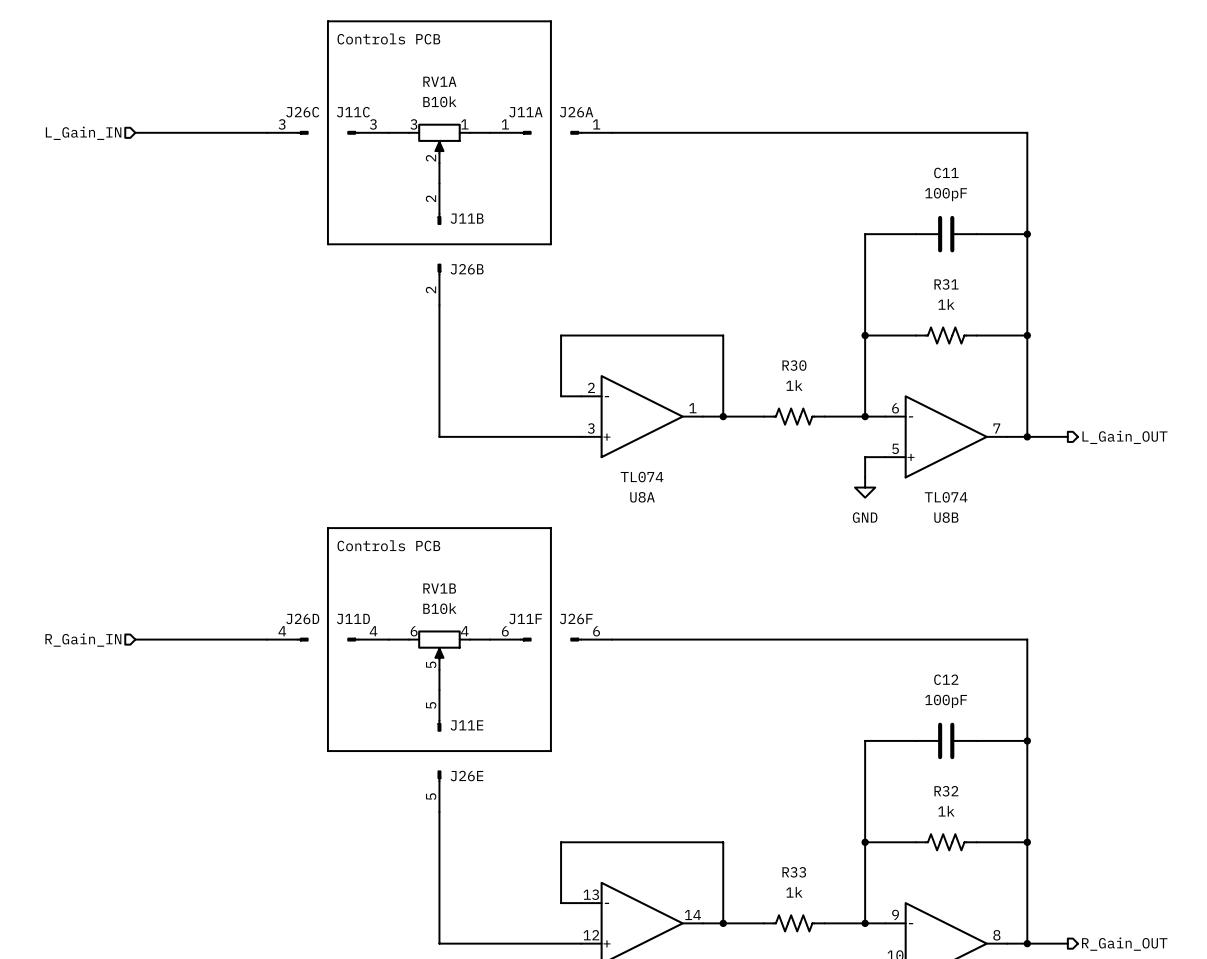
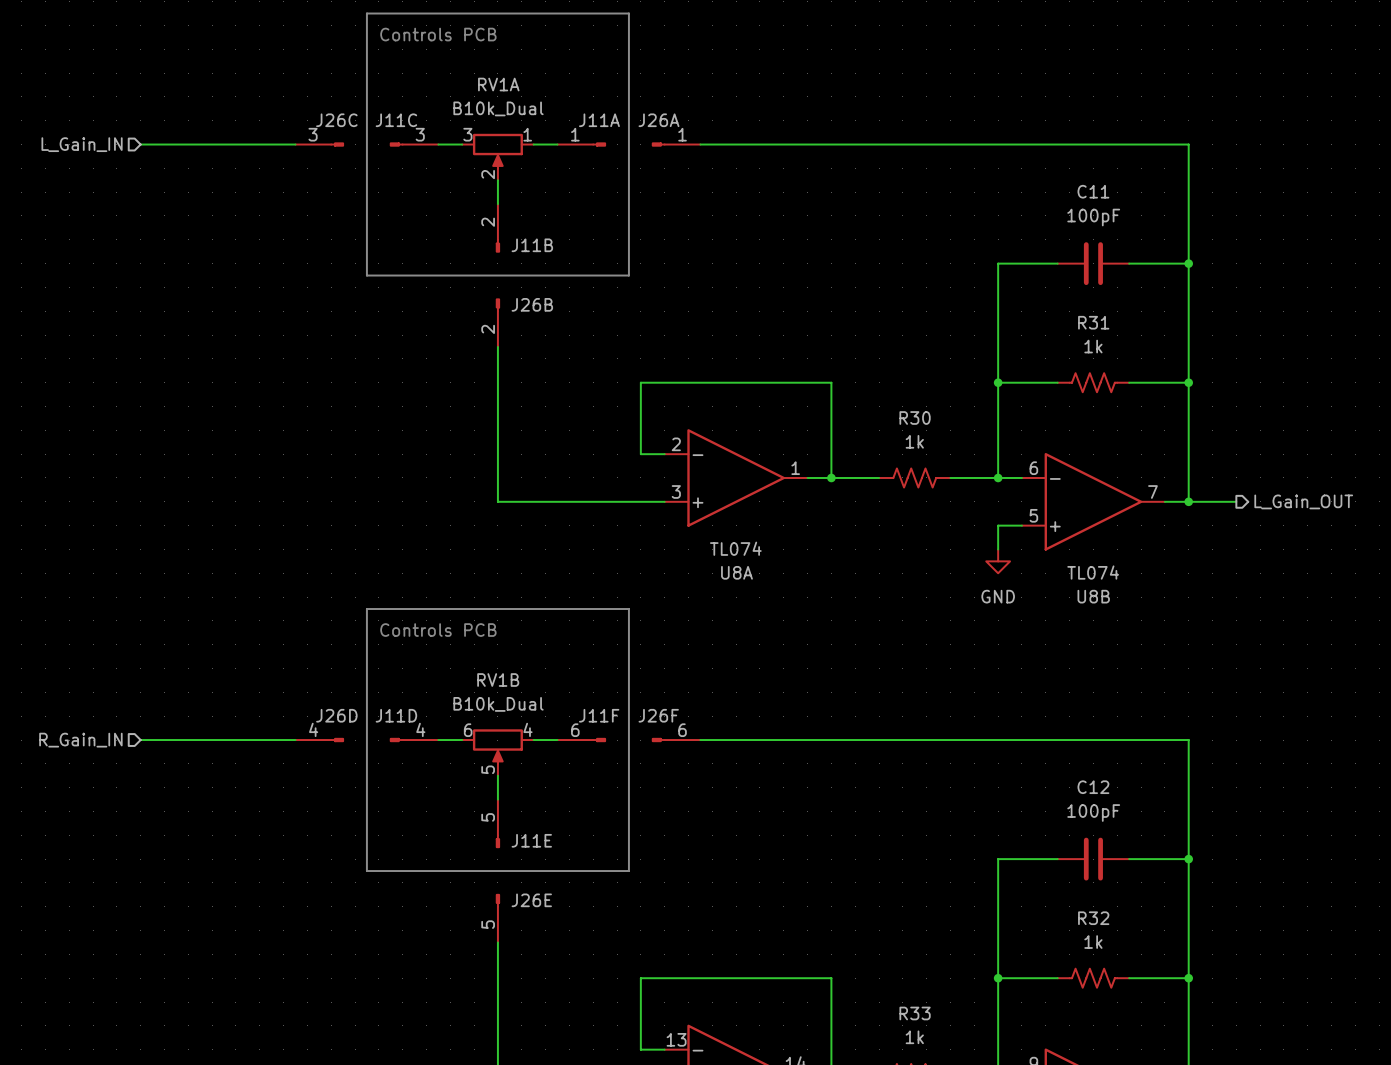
RV1A value: B10k (439, 101) -> B10k_Dual (498, 108)
RV1B value: B10k (439, 608) -> B10k_Dual (498, 704)

